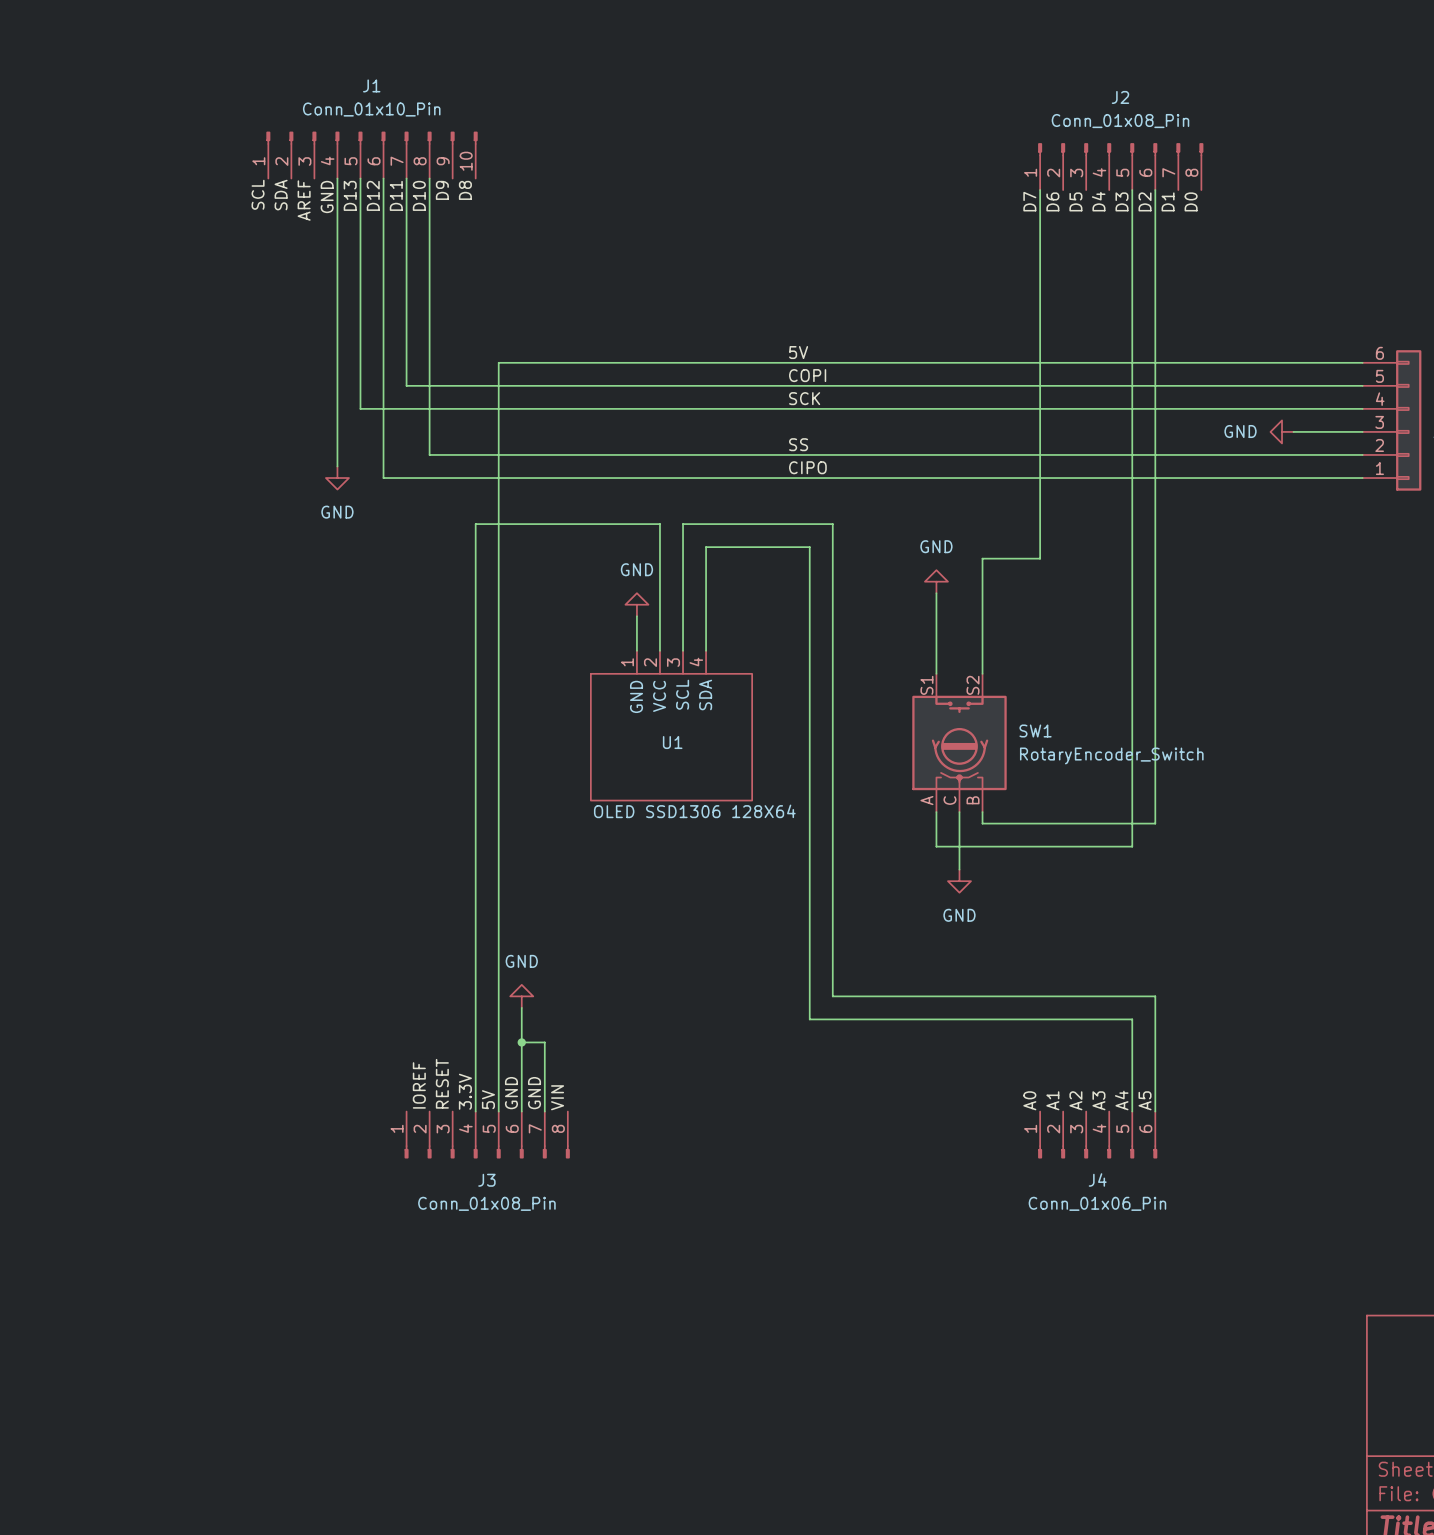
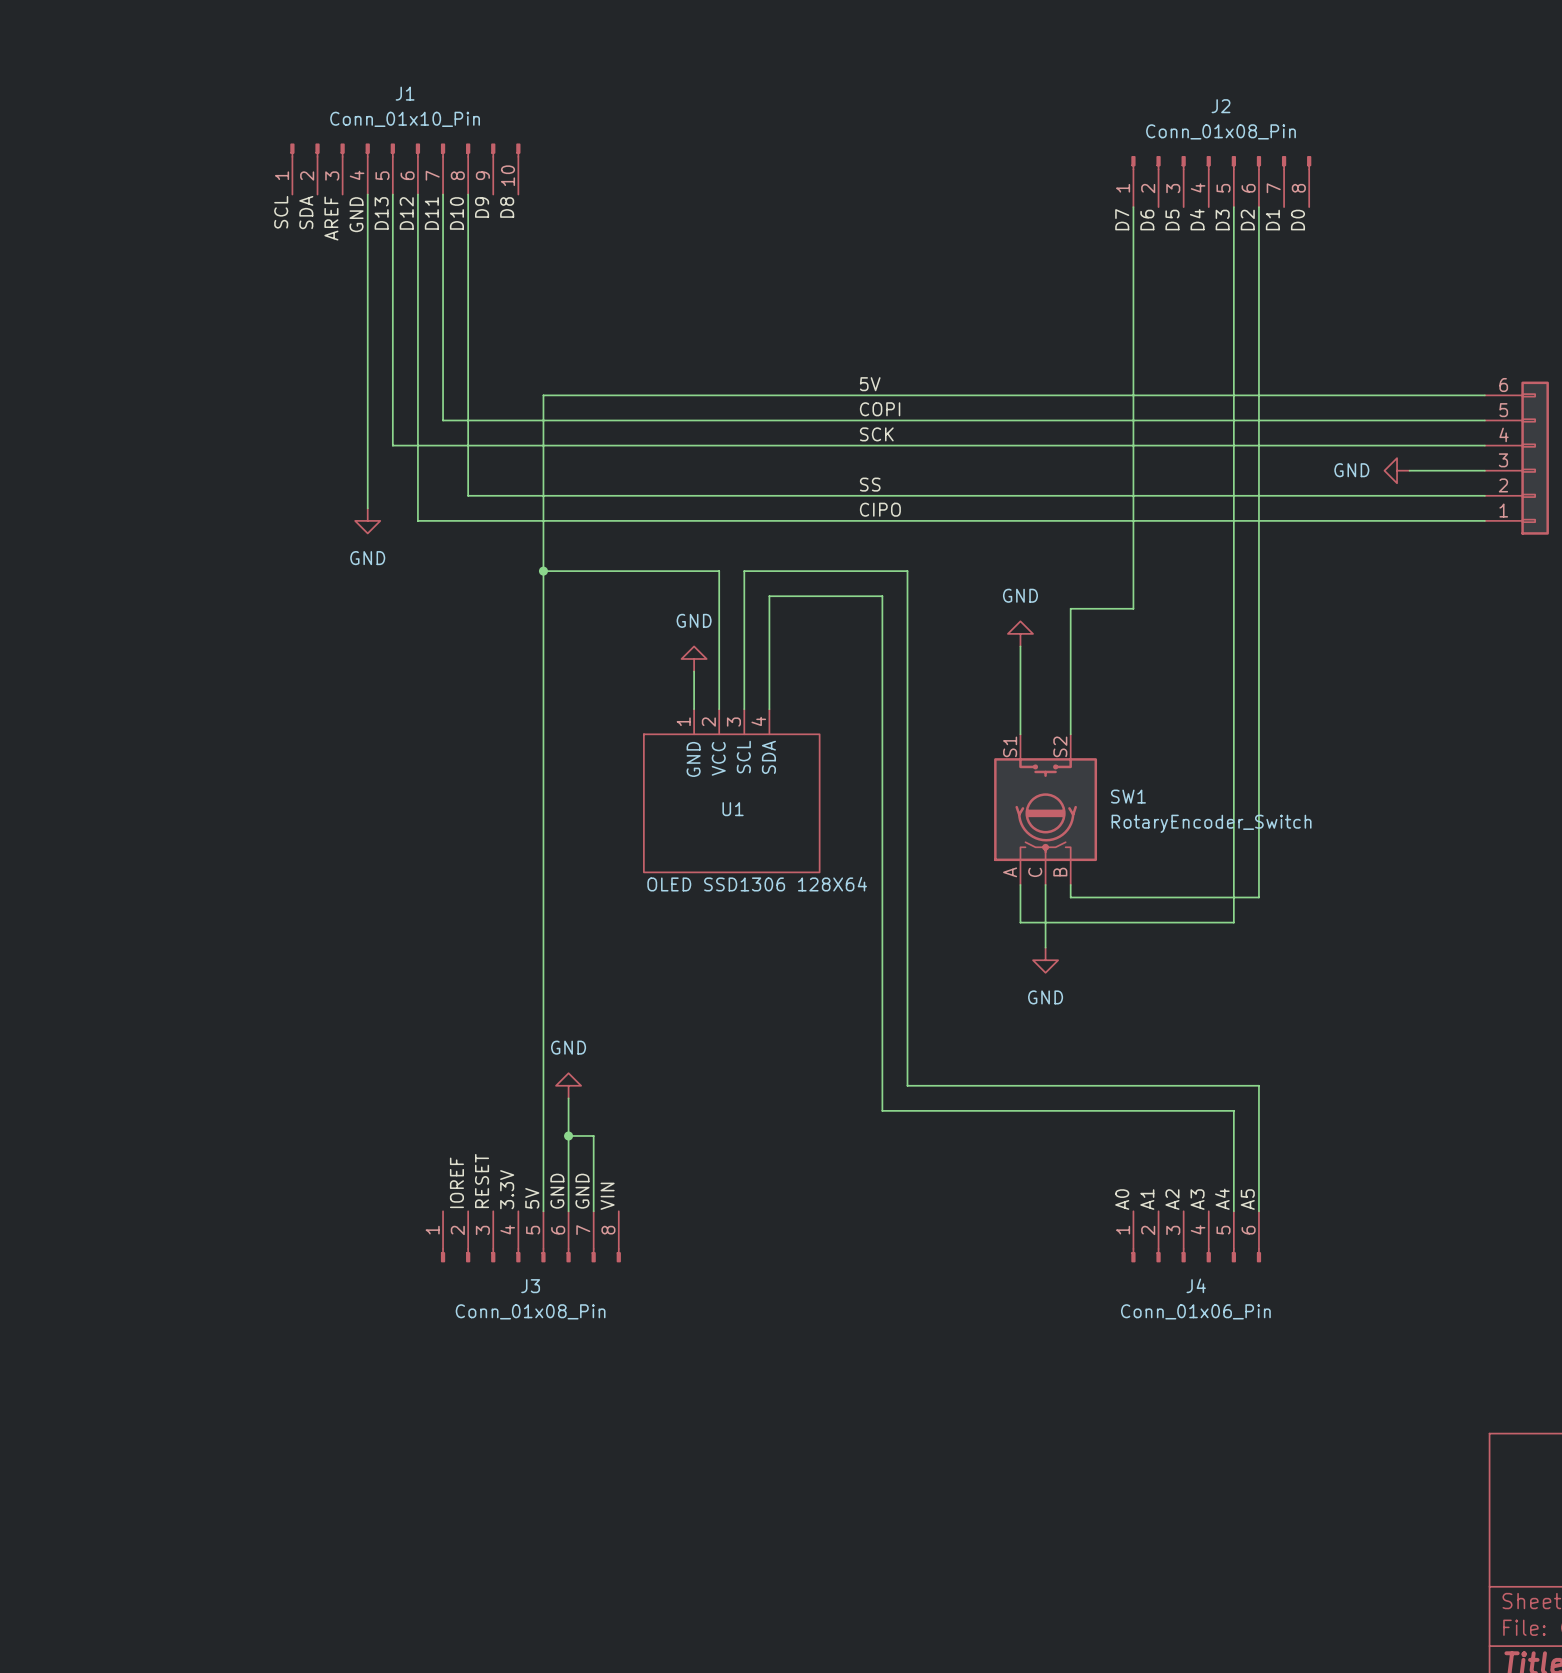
wire: (498, 524) (475, 524) (475, 1111) -> none
junction: none -> (543, 571)

